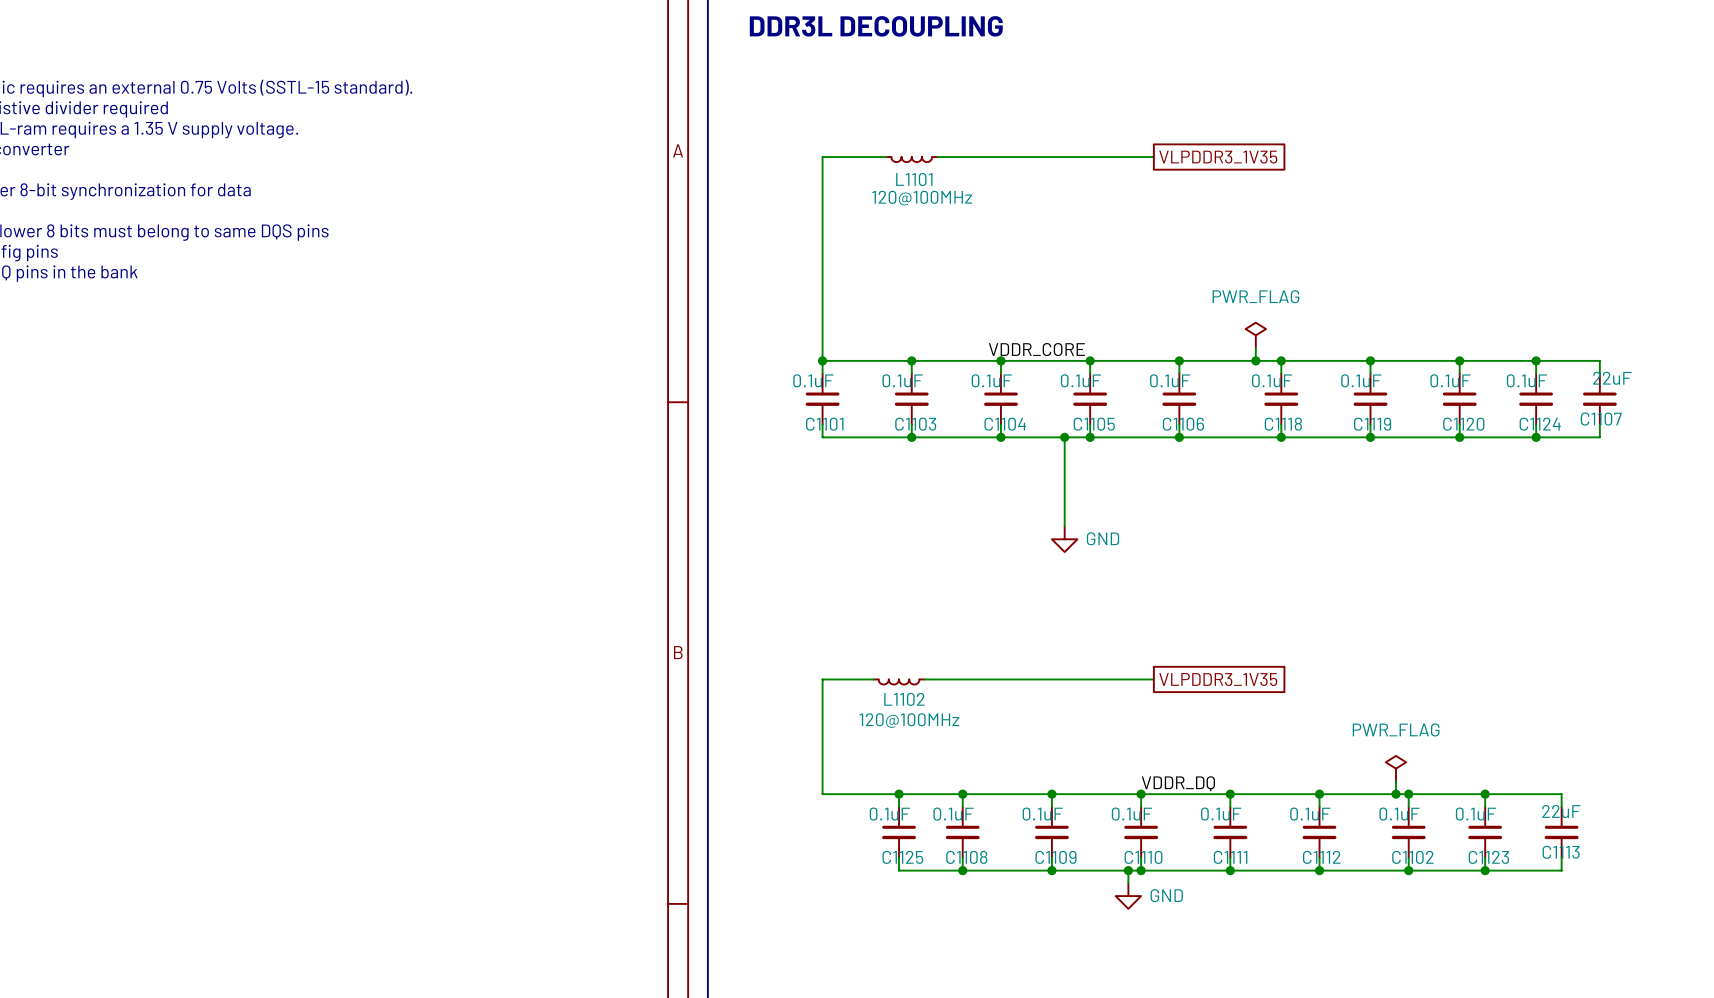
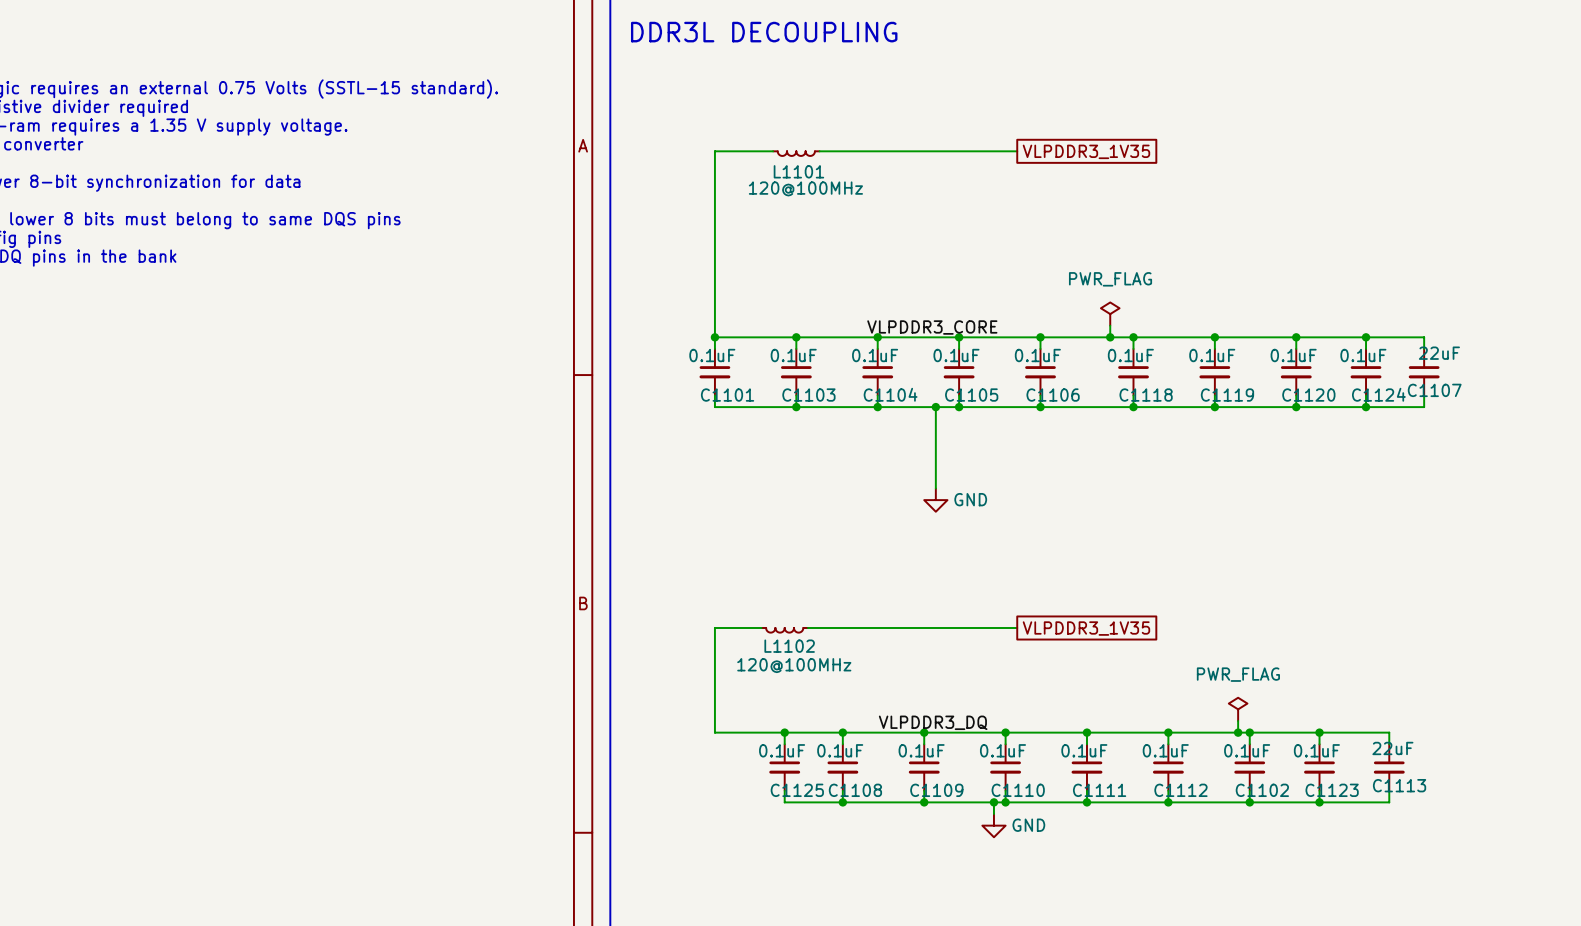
label: VDDR_CORE (1036, 349) -> VLPDDR3_CORE (932, 327)
label: none -> VLPDDR3_DQ (933, 722)
label: VDDR_DQ (1178, 783) -> none

